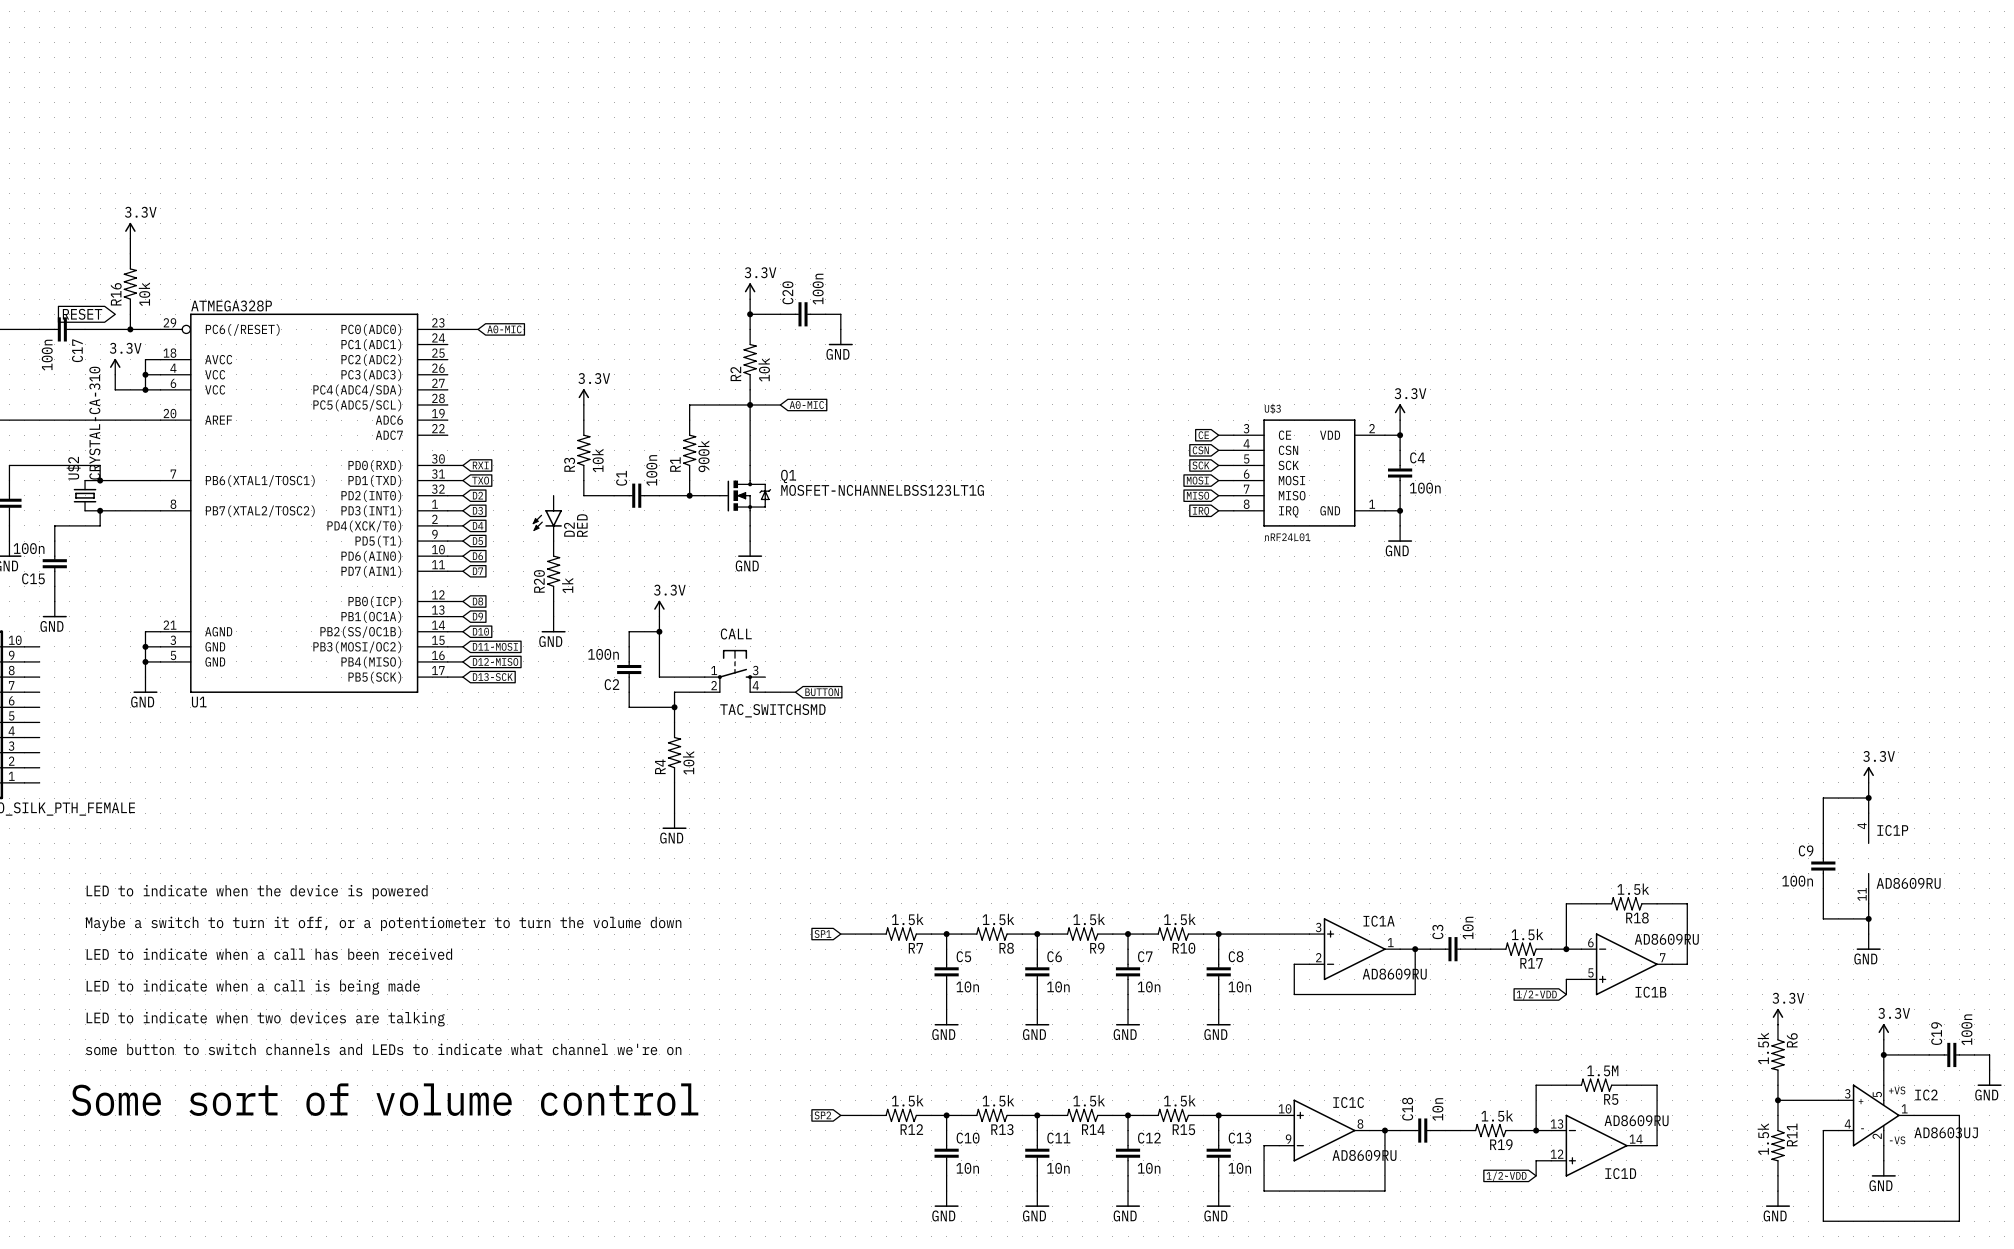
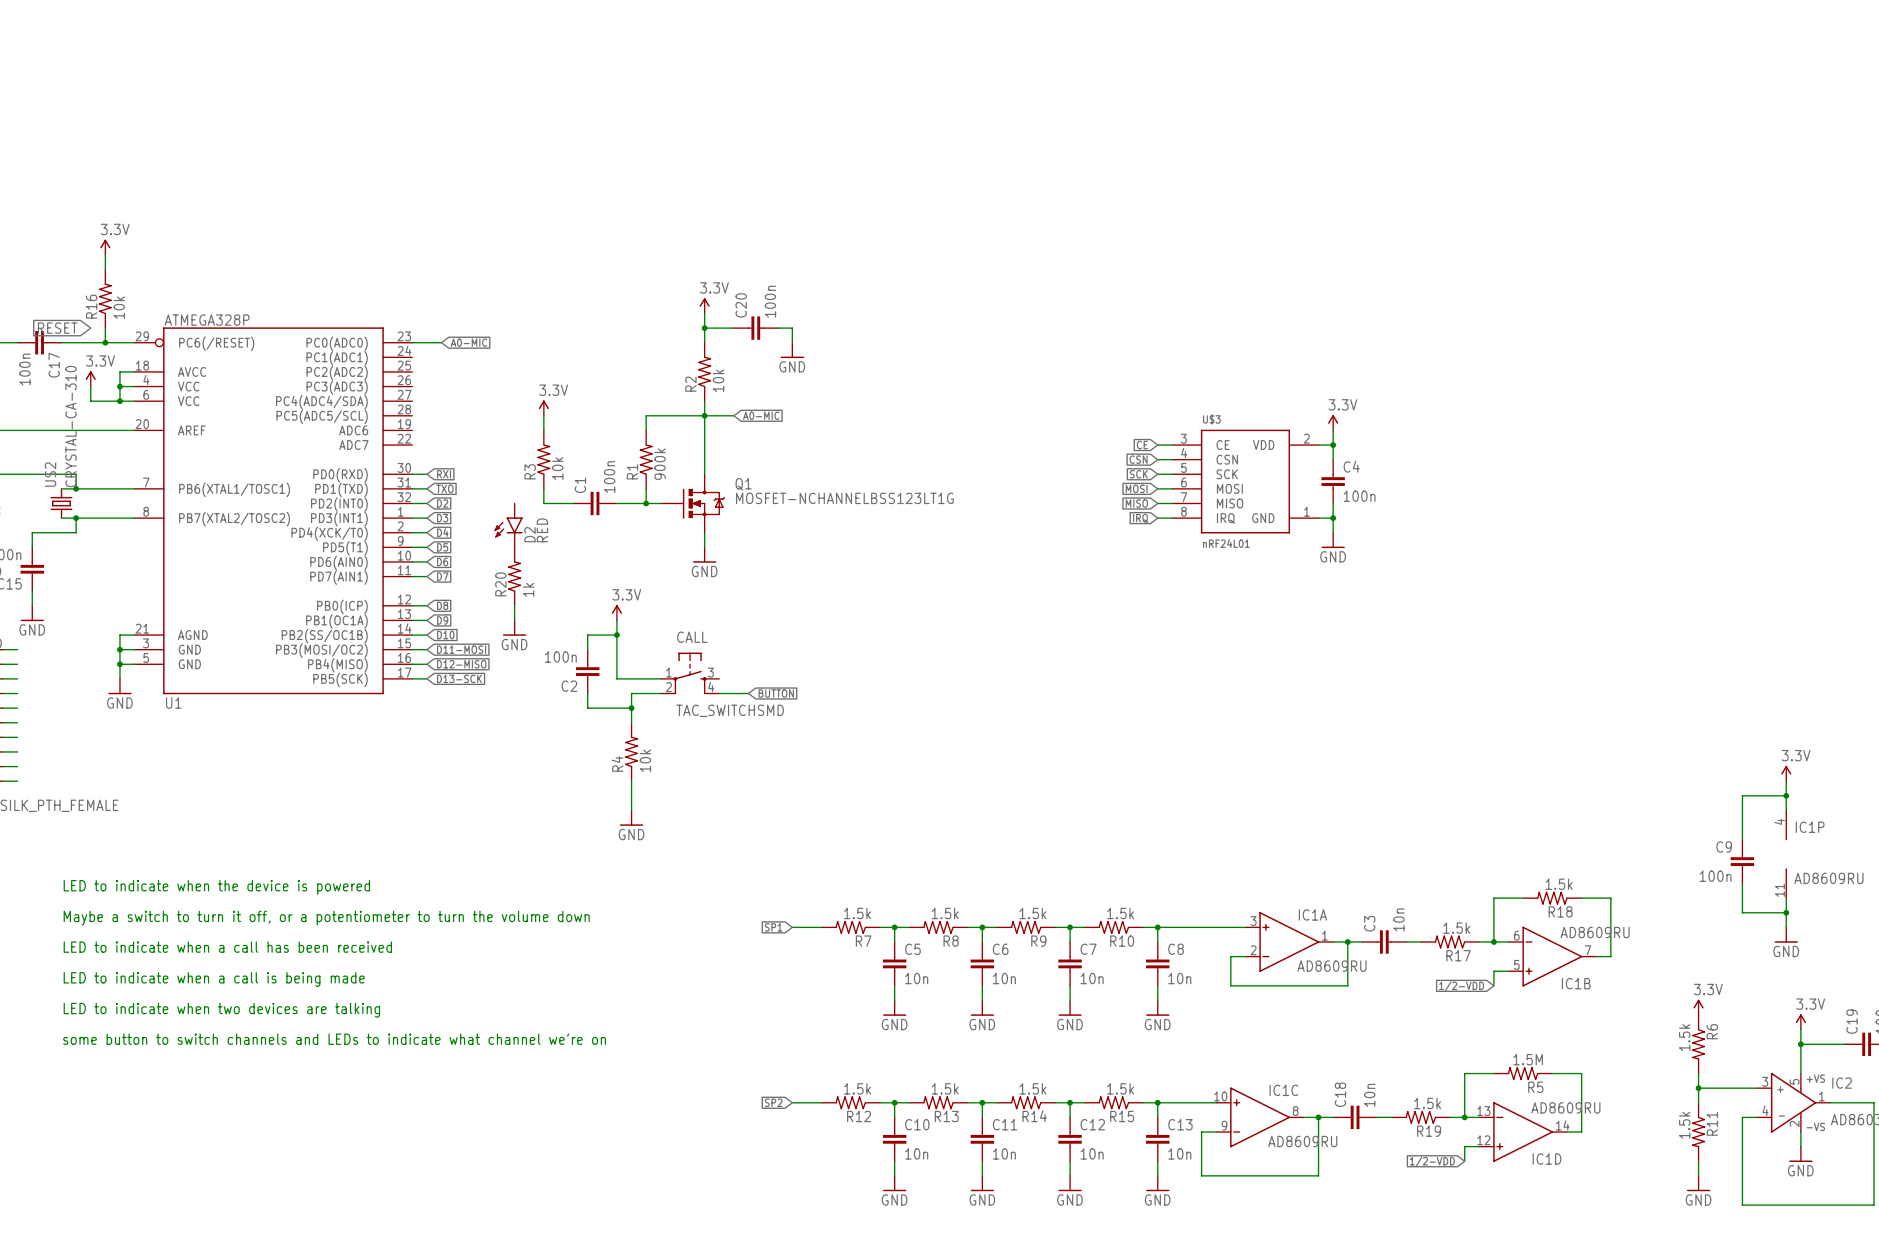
text: Some sort of volume control (384, 1099) -> none

